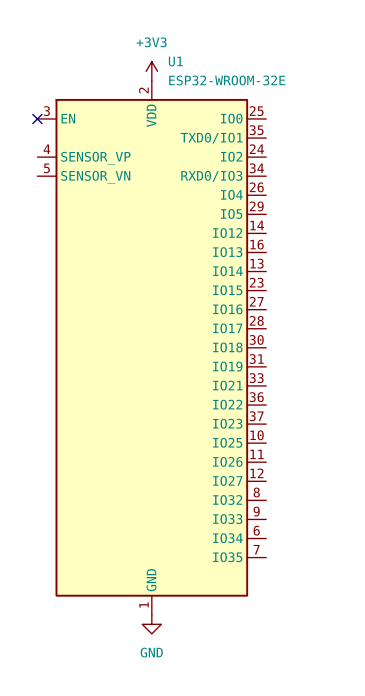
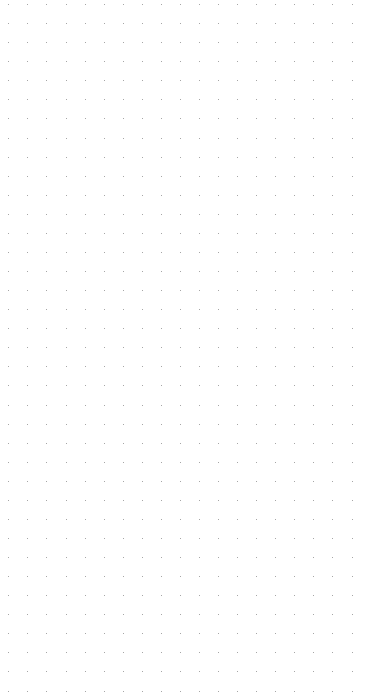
power symbol: +3V3 (151, 71) -> none
no-connect mark: (37, 118) -> none
U1: ESP32-WROOM-32E (151, 347) -> none
power symbol: GND (151, 624) -> none

